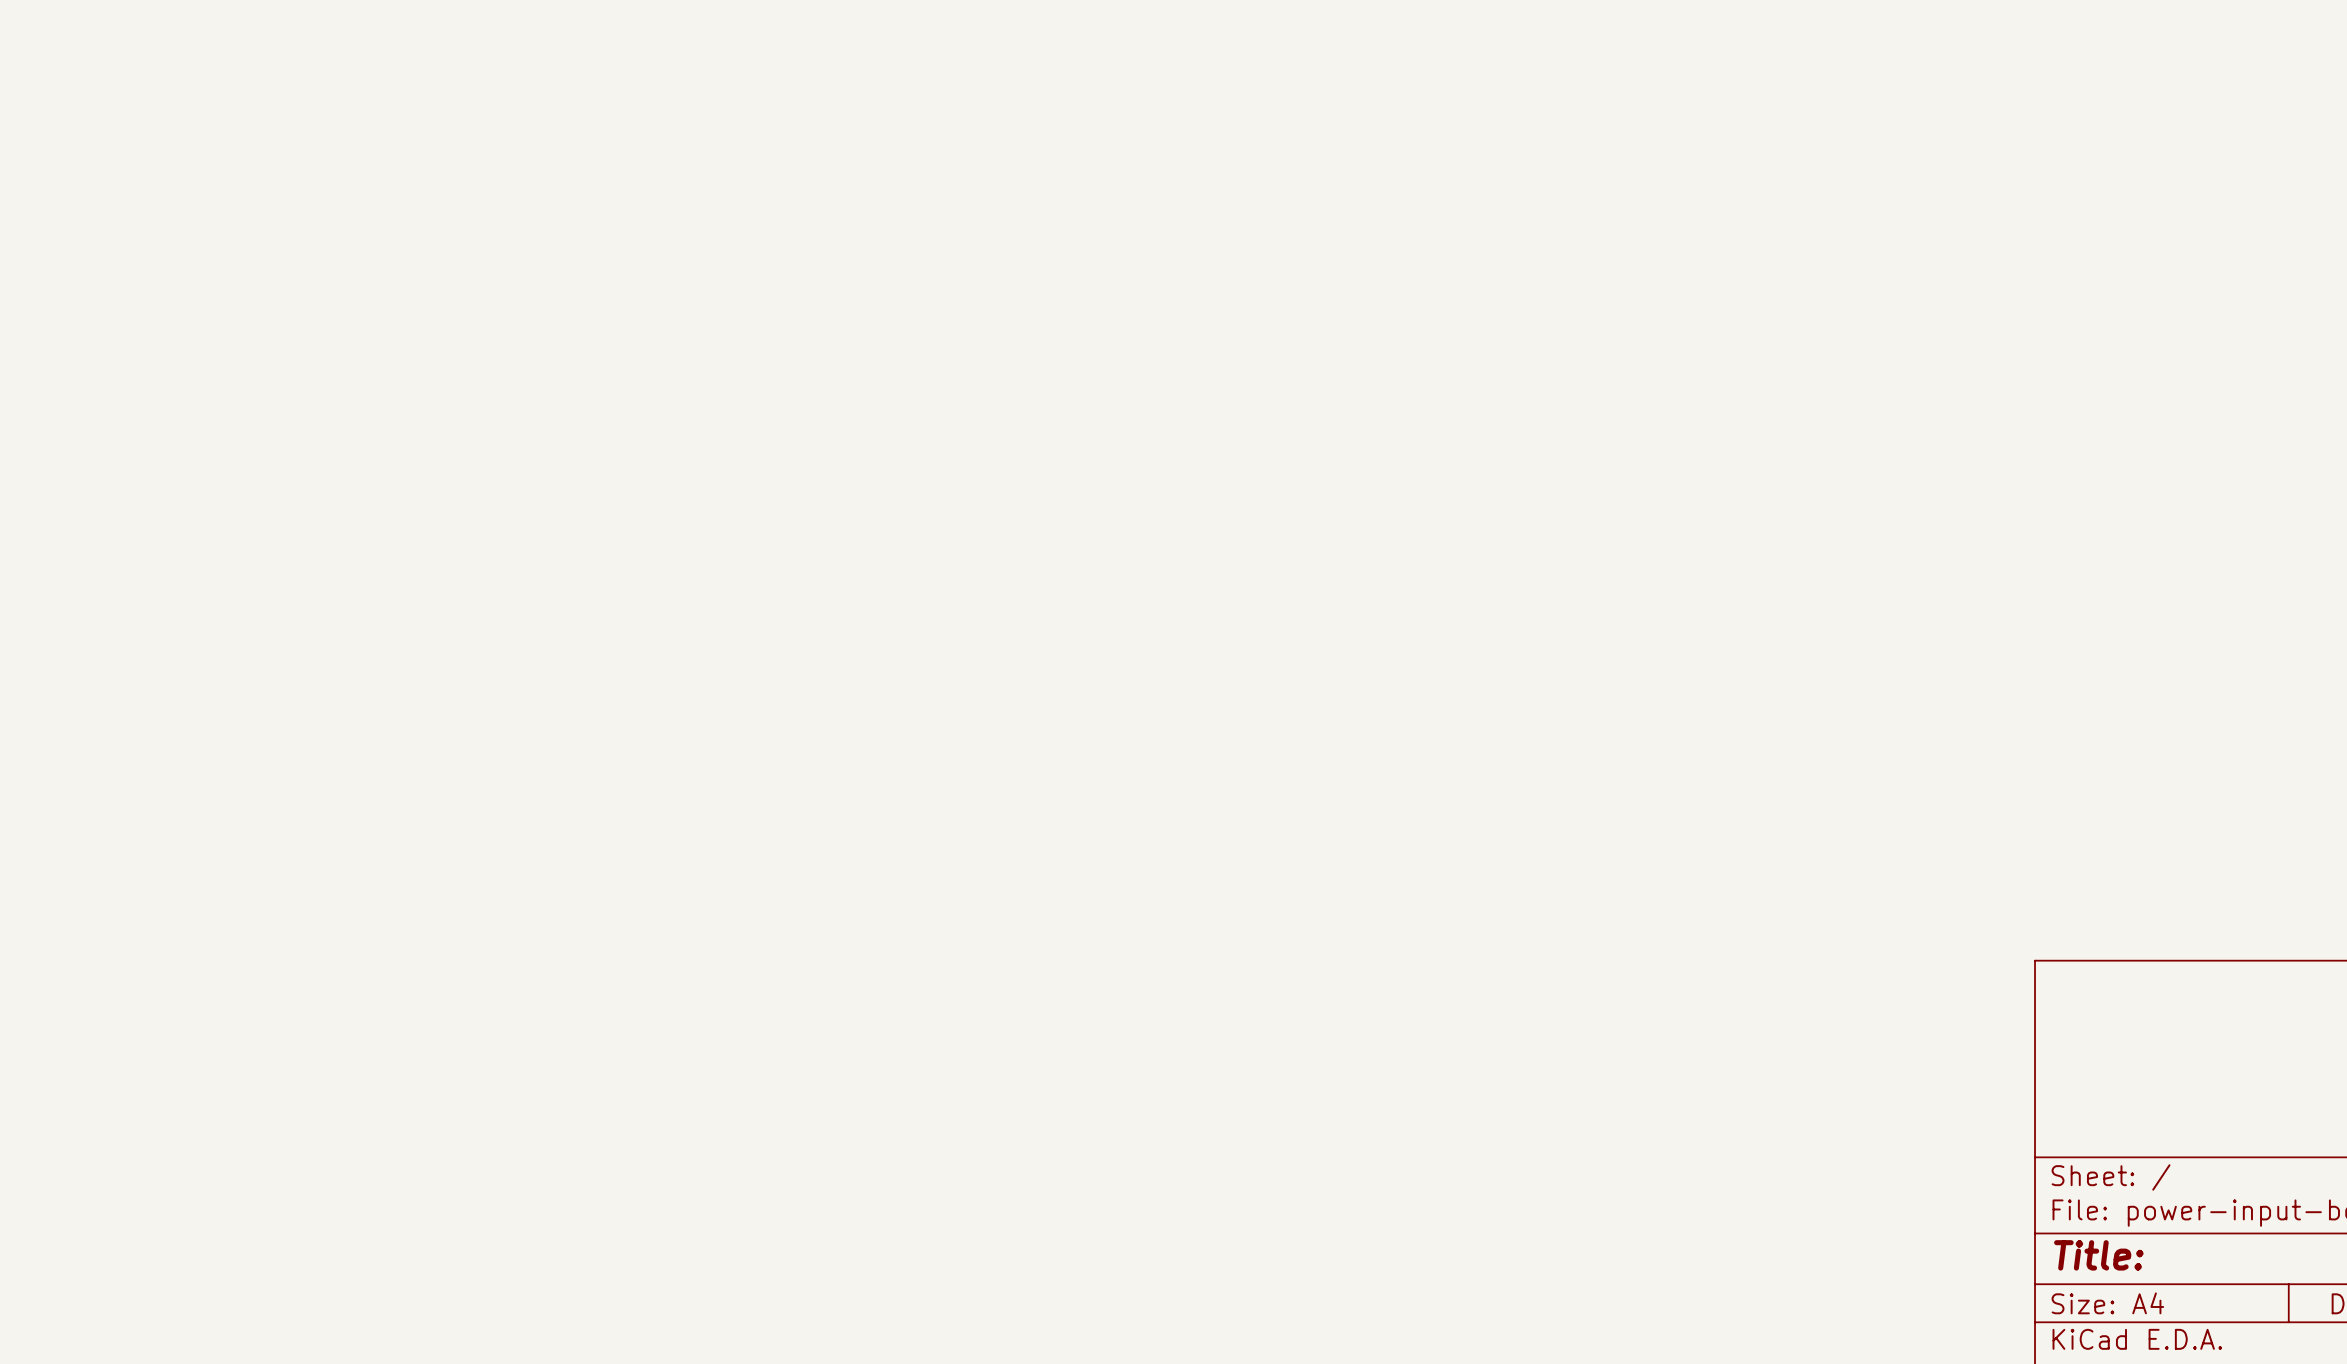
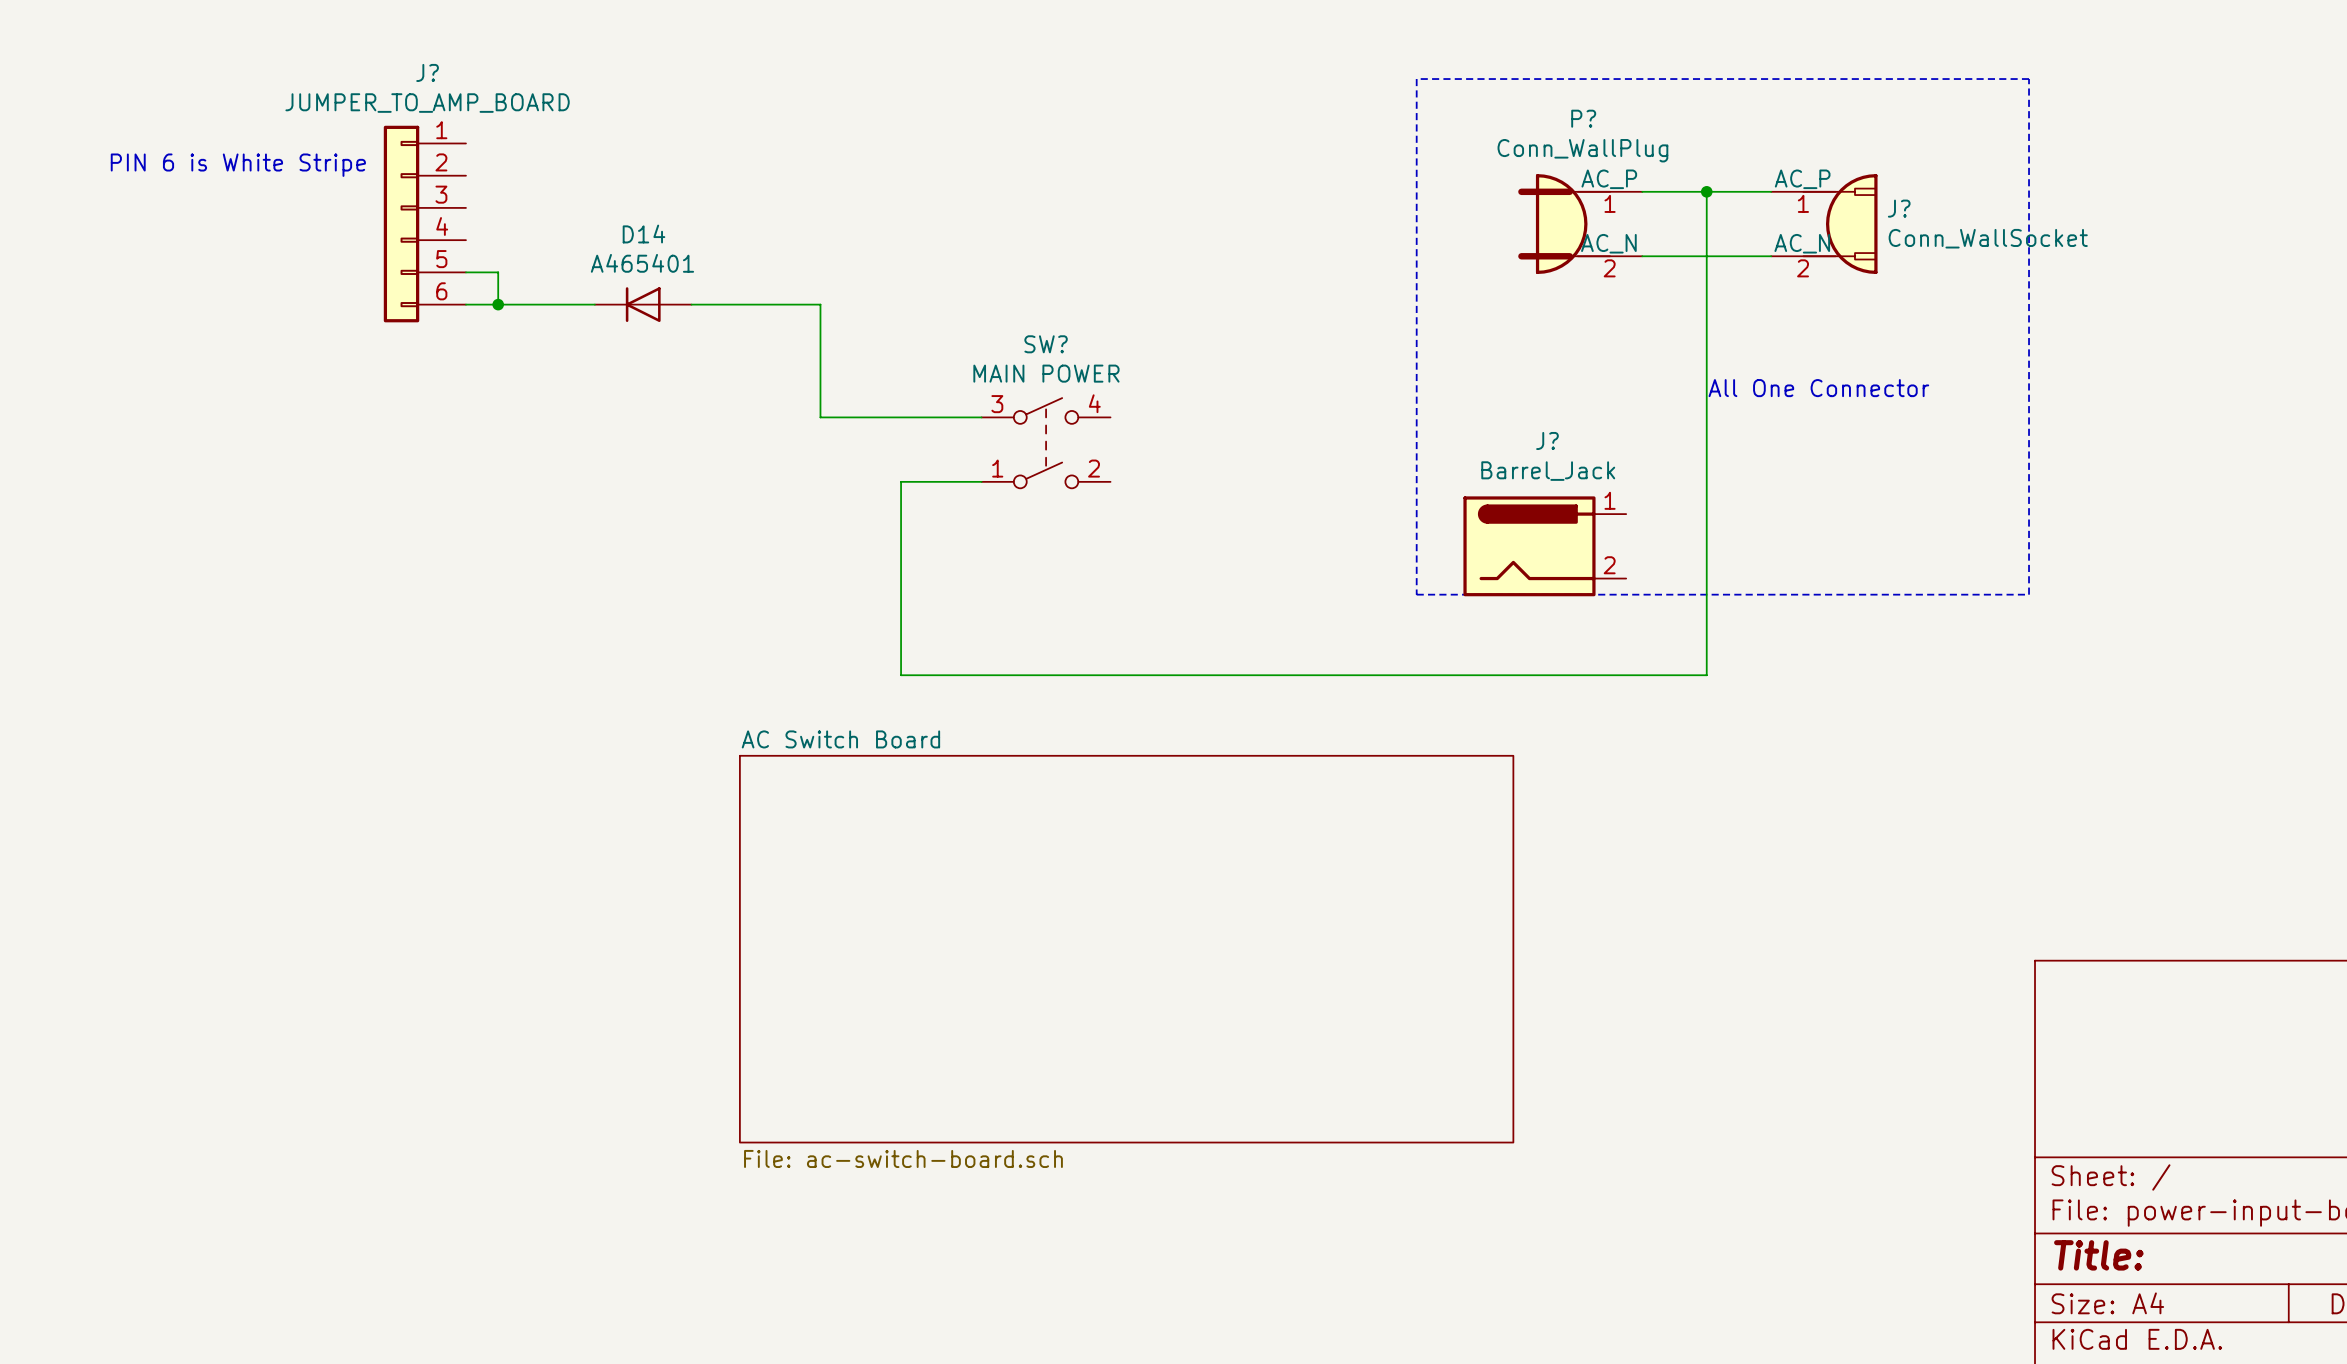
line: none -> (1416, 79) (1416, 594) (2029, 594) (2029, 79) (1416, 79)
text: none -> PIN 6 is White Stripe (238, 165)
wire: none -> (1642, 191) (1771, 191)
wire: none -> (1706, 191) (1706, 675) (901, 675) (901, 481) (981, 481)
junction: none -> (1706, 191)
J?: none -> JUMPER_TO_AMP_BOARD (424, 224)
P?: none -> Conn_WallPlug (1580, 224)
J?: none -> Conn_WallSocket (1824, 224)
wire: none -> (1642, 256) (1771, 256)
wire: none -> (465, 272) (498, 272) (498, 304)
wire: none -> (465, 304) (594, 304)
junction: none -> (498, 304)
D14: none -> A465401 (643, 304)
wire: none -> (691, 304) (820, 304) (820, 417) (981, 417)
text: none -> All One Connector (1818, 388)
SW?: none -> MAIN POWER (1046, 443)
J?: none -> Barrel_Jack (1544, 546)
sheet AC Switch Board: none -> File: ac-switch-board.sch (1126, 949)

